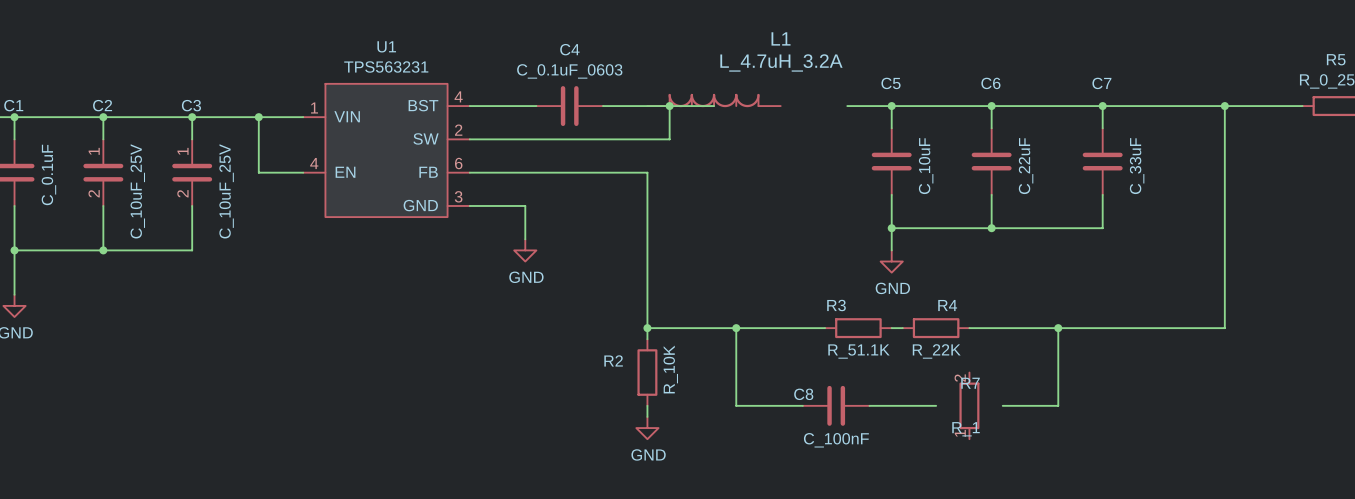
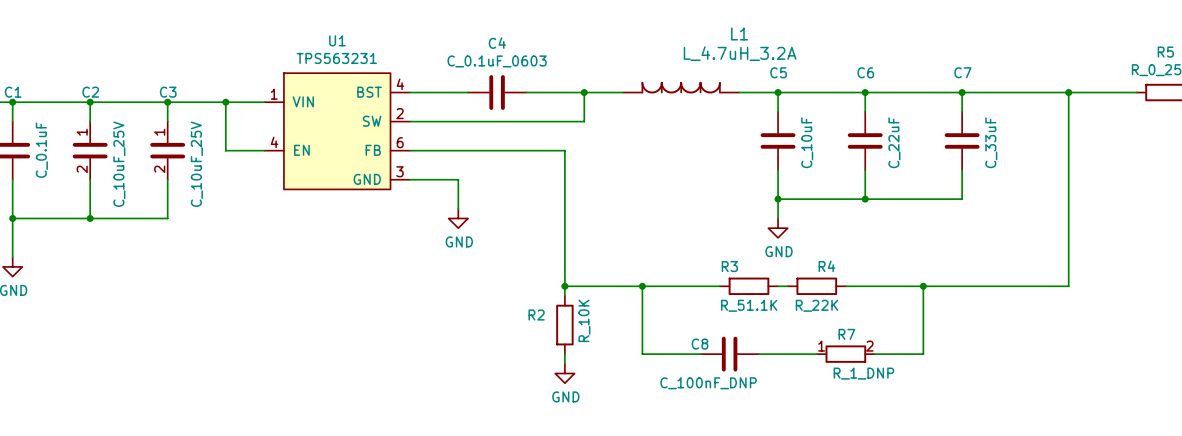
L1 position: (714, 100) -> (681, 87)
R7 rotation: 0° (969, 405) -> 90° clockwise (845, 354)
R7 value: R_1 (966, 429) -> R_1_DNP (863, 373)
C8 value: C_100nF (836, 440) -> C_100nF_DNP (708, 383)

